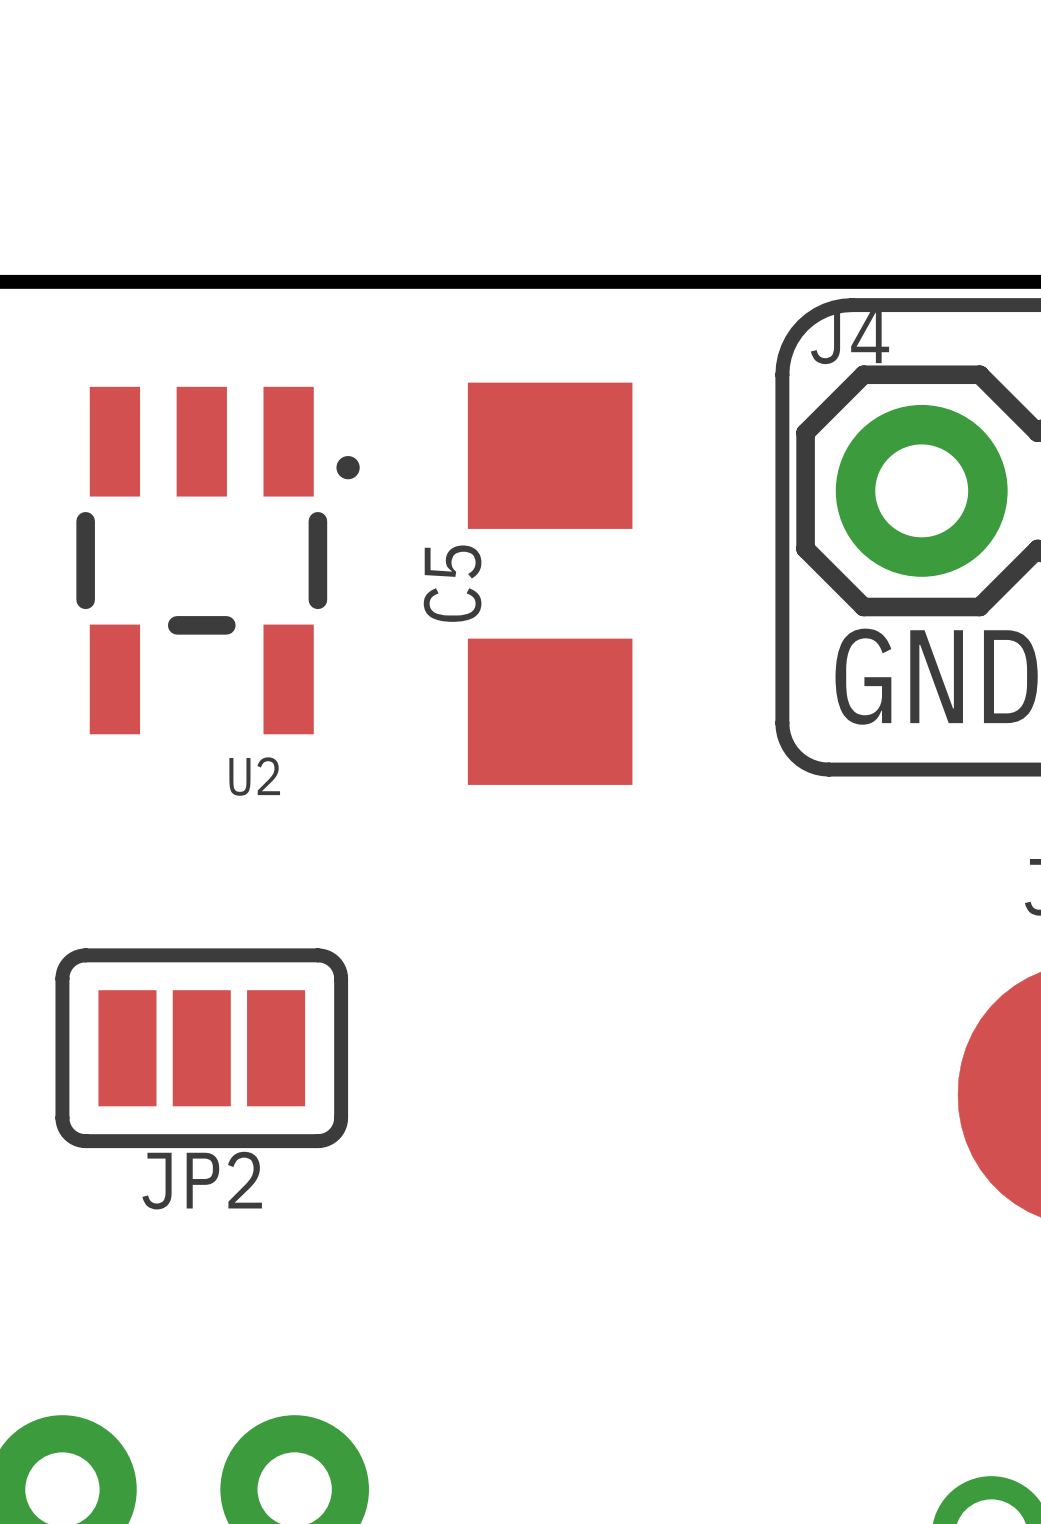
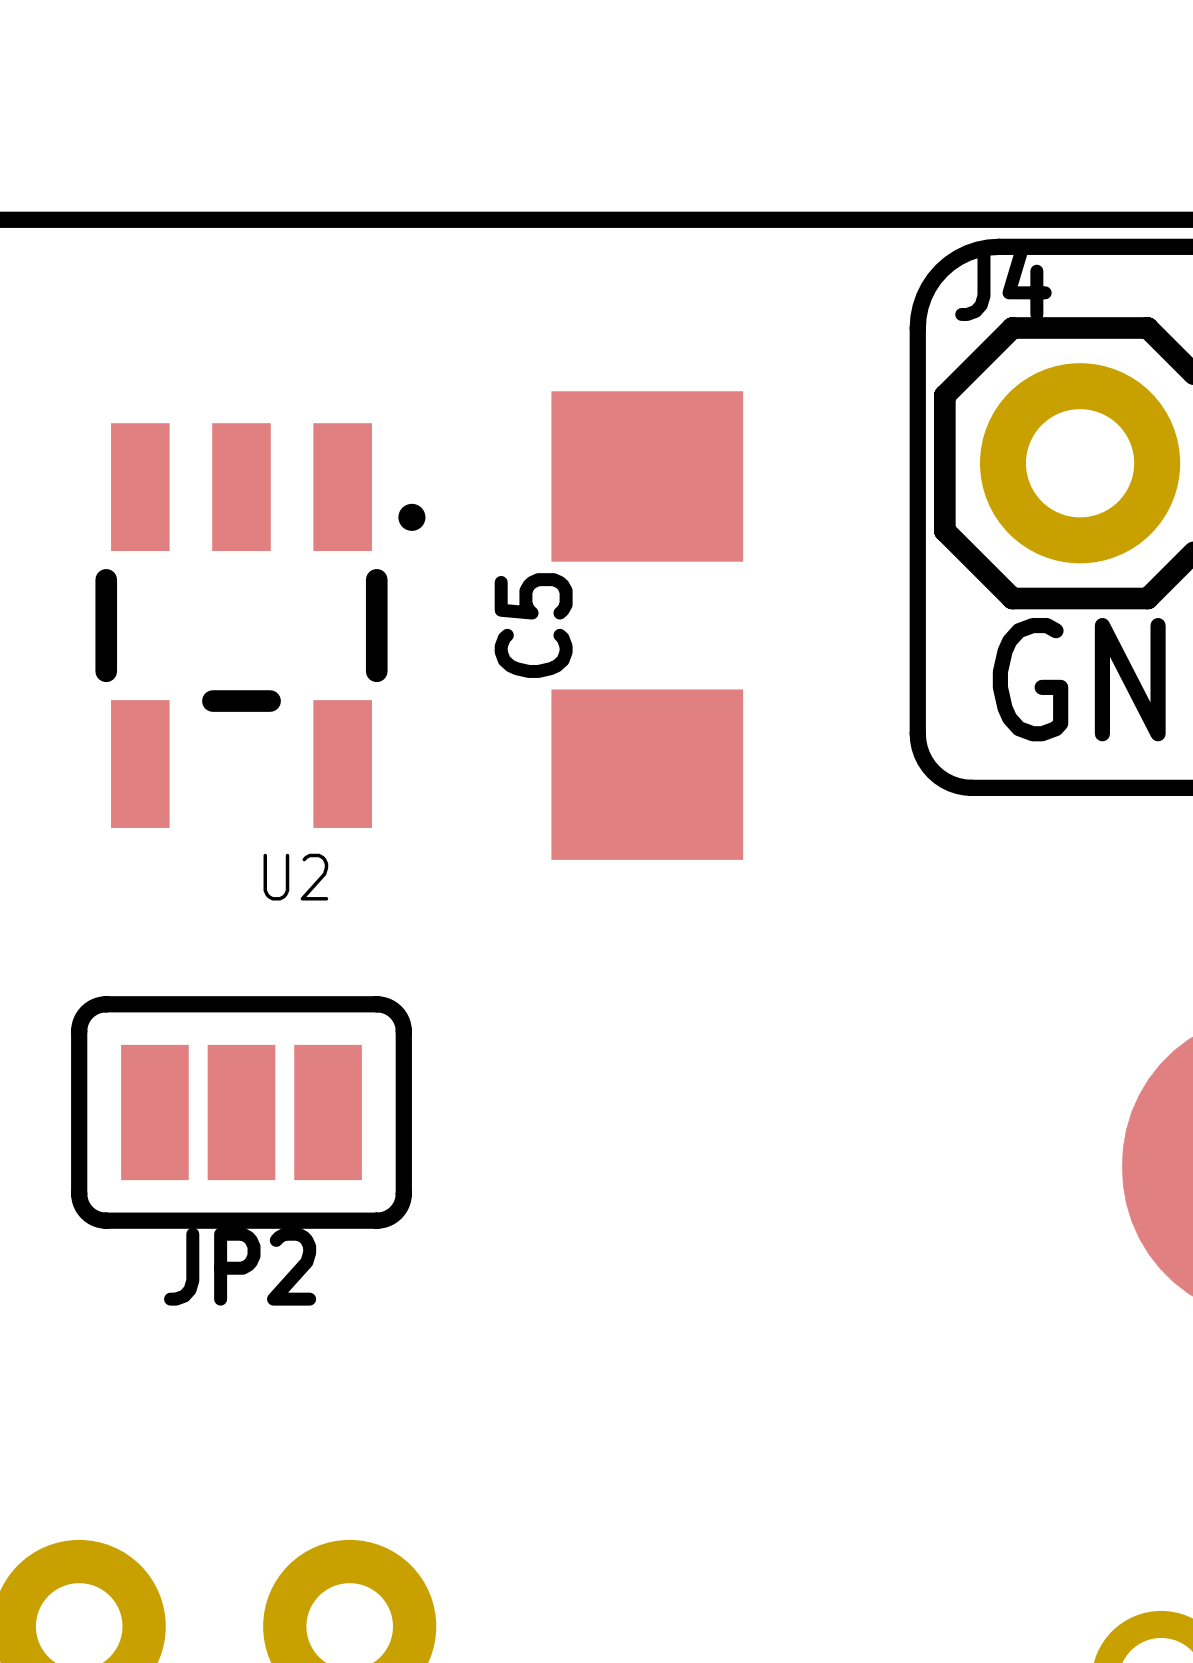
U2 position: (218, 560) -> (260, 625)
C5 position: (550, 583) -> (647, 625)

